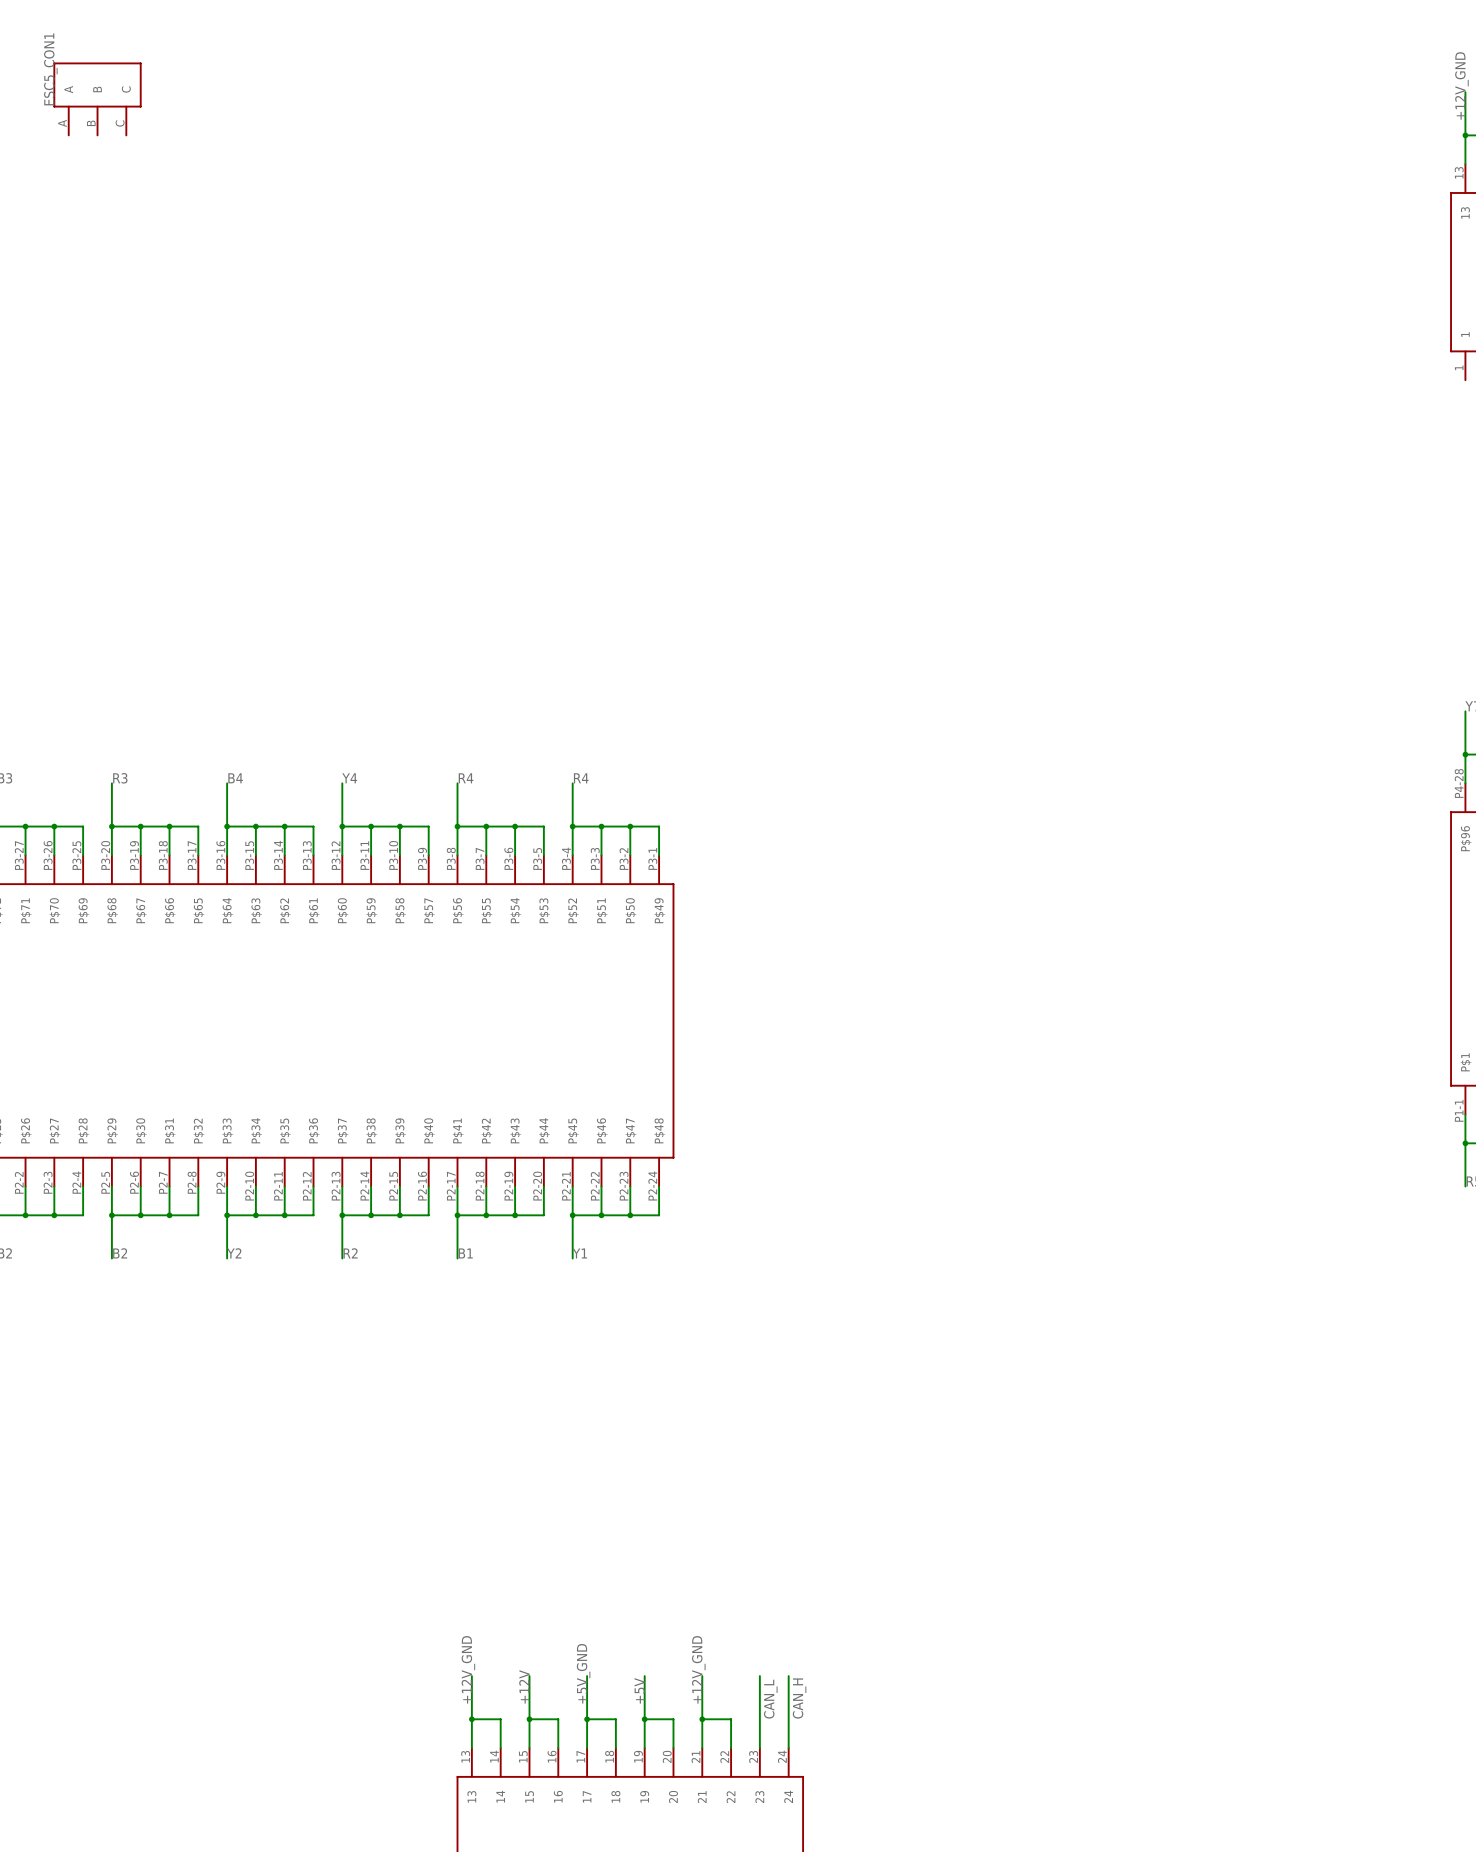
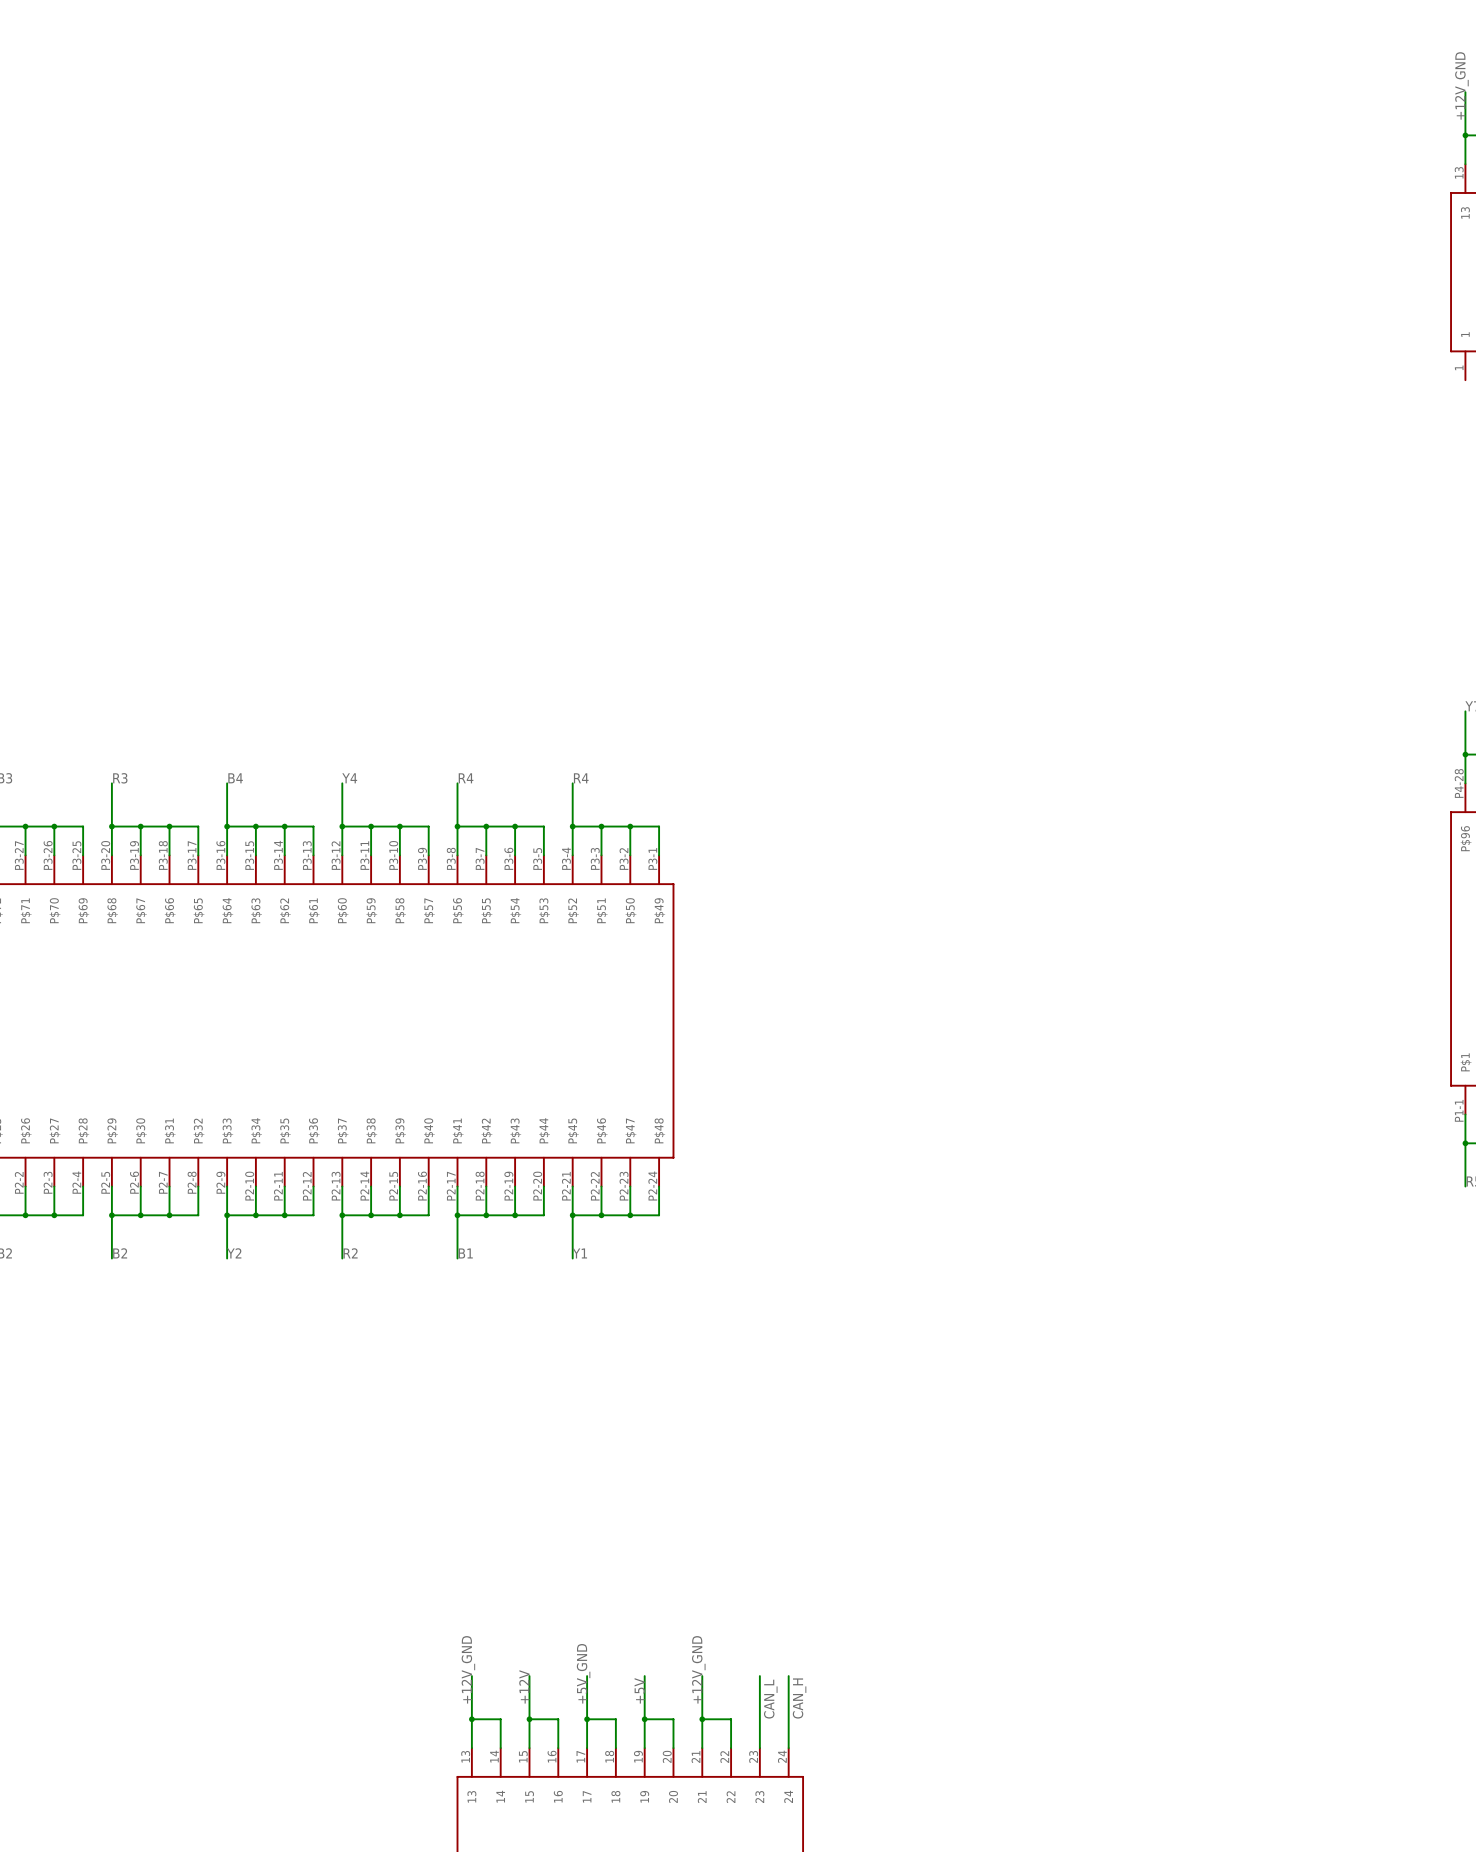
ESC5_CON1: (97, 99) -> none

